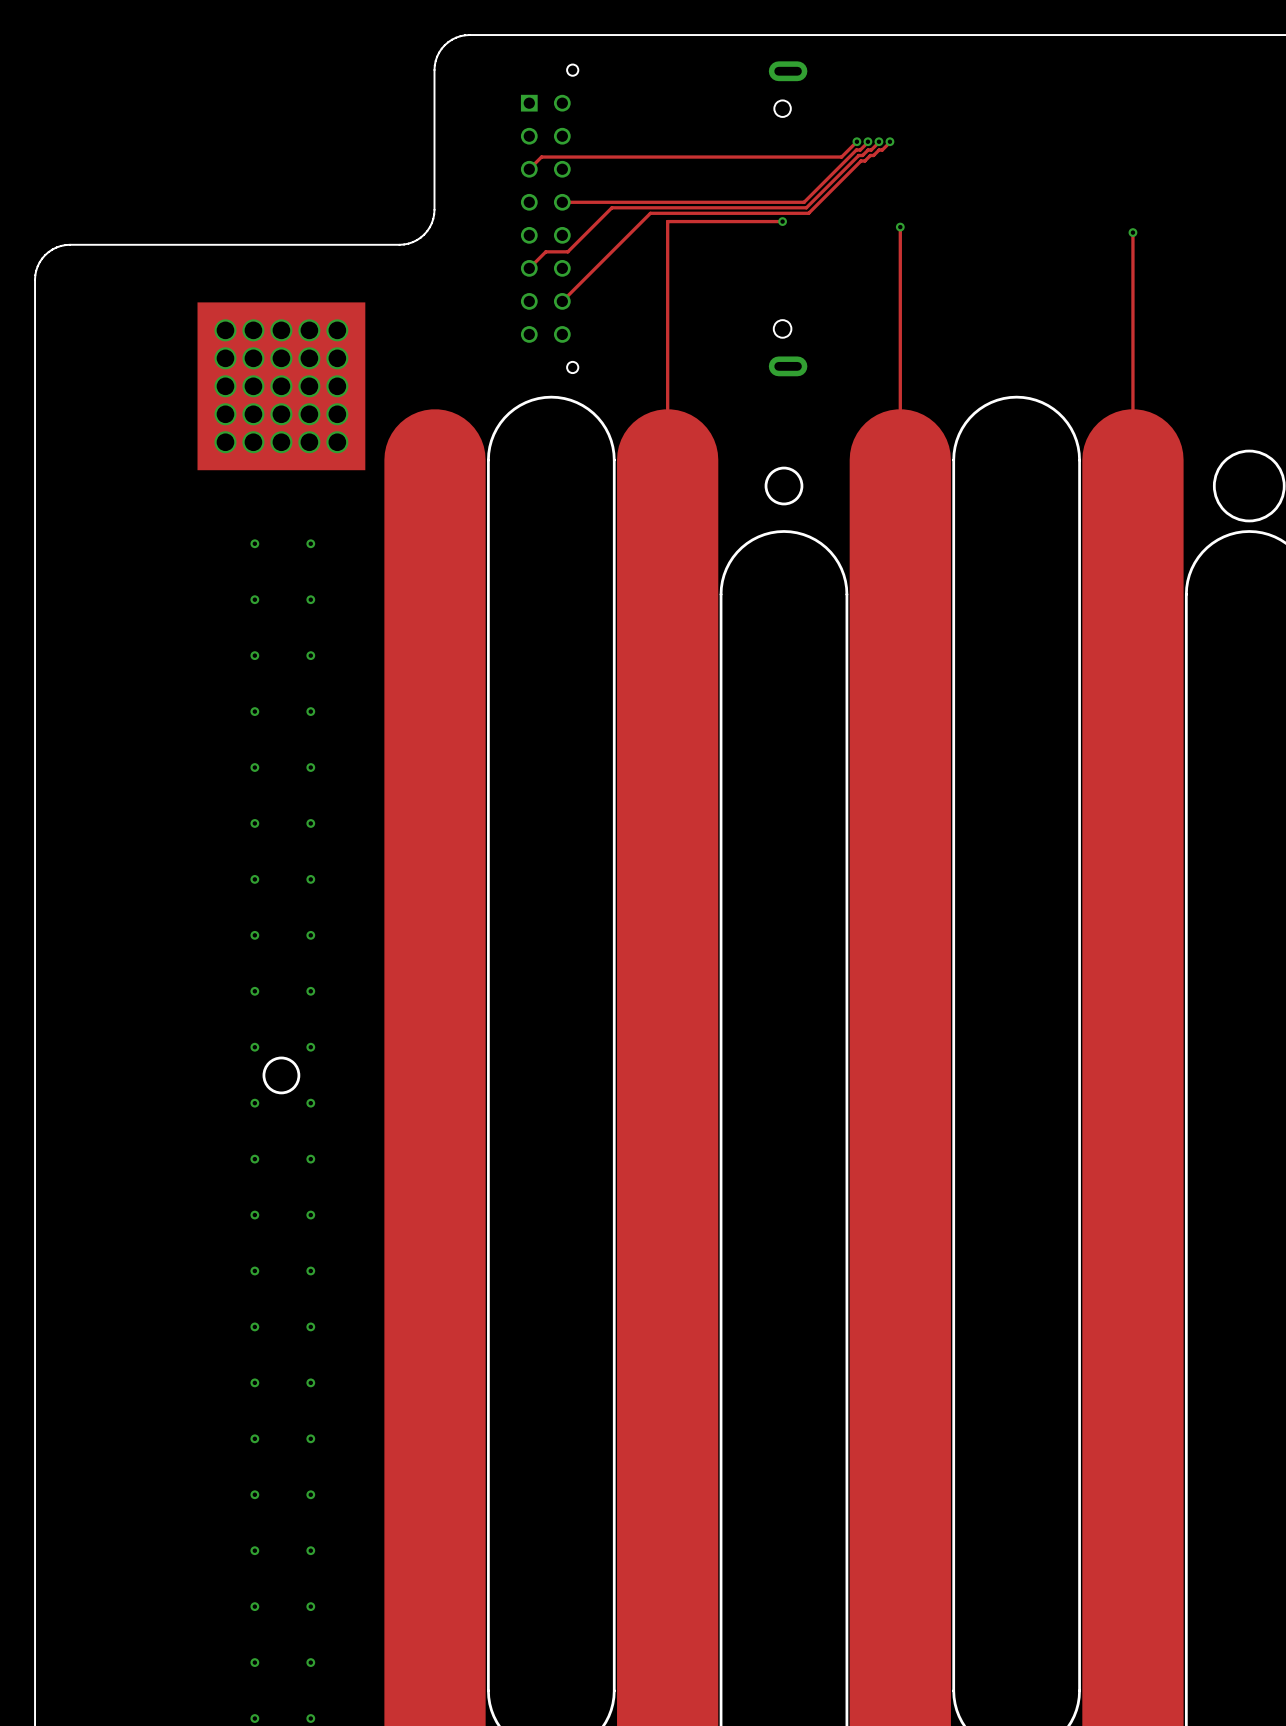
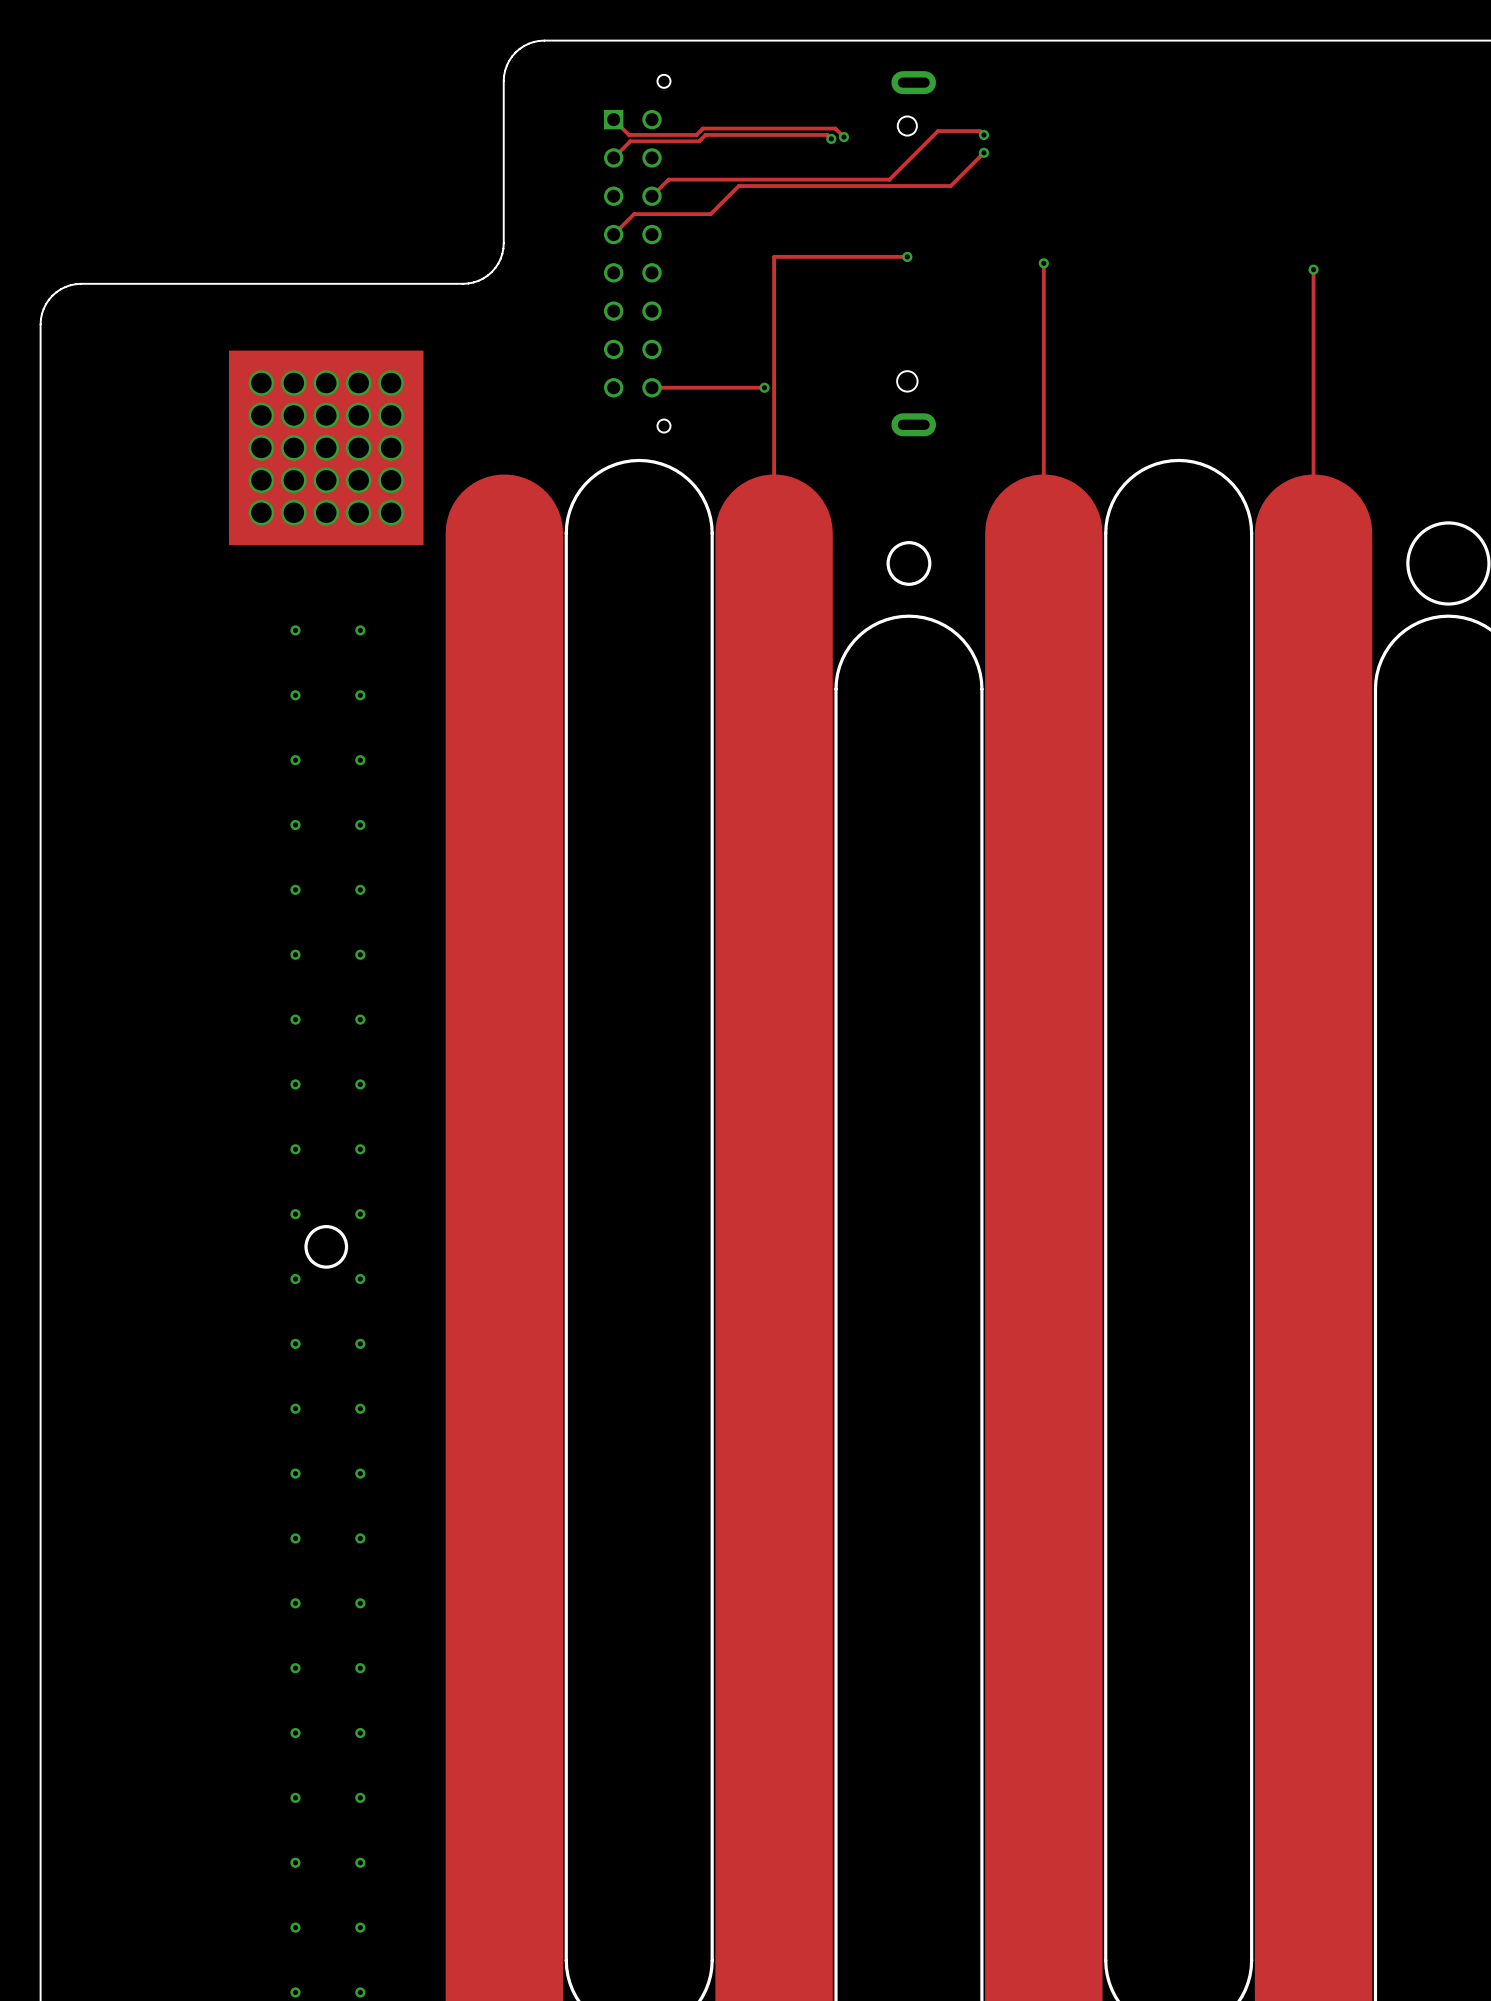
track: none -> (613, 119) (629, 134) (696, 134) (702, 128) (835, 128) (843, 137)
track: none -> (983, 134) (980, 131) (937, 131) (889, 179) (668, 179) (651, 196)
via: none -> (983, 134)
via: none -> (843, 137)
track: none -> (831, 138) (827, 134) (705, 134) (699, 141) (630, 141) (613, 157)
via: none -> (831, 138)
track: none -> (983, 152) (950, 186) (738, 186) (710, 214) (634, 214) (613, 234)
via: none -> (983, 152)
track: (856, 141) (841, 157) (541, 157) (529, 169) -> none
via: (856, 141) -> none
track: (867, 141) (860, 149) (856, 149) (804, 202) (562, 202) -> none
via: (867, 141) -> none
track: (878, 141) (871, 149) (868, 149) (862, 155) (858, 155) (806, 207) (611, 207) (567, 251) (545, 251) (529, 268) -> none
via: (878, 141) -> none
track: (889, 141) (882, 149) (870, 155) (864, 161) (861, 161) (808, 213) (650, 213) (562, 301) -> none
via: (889, 141) -> none
track: none -> (651, 387) (764, 387)
via: none -> (764, 387)

